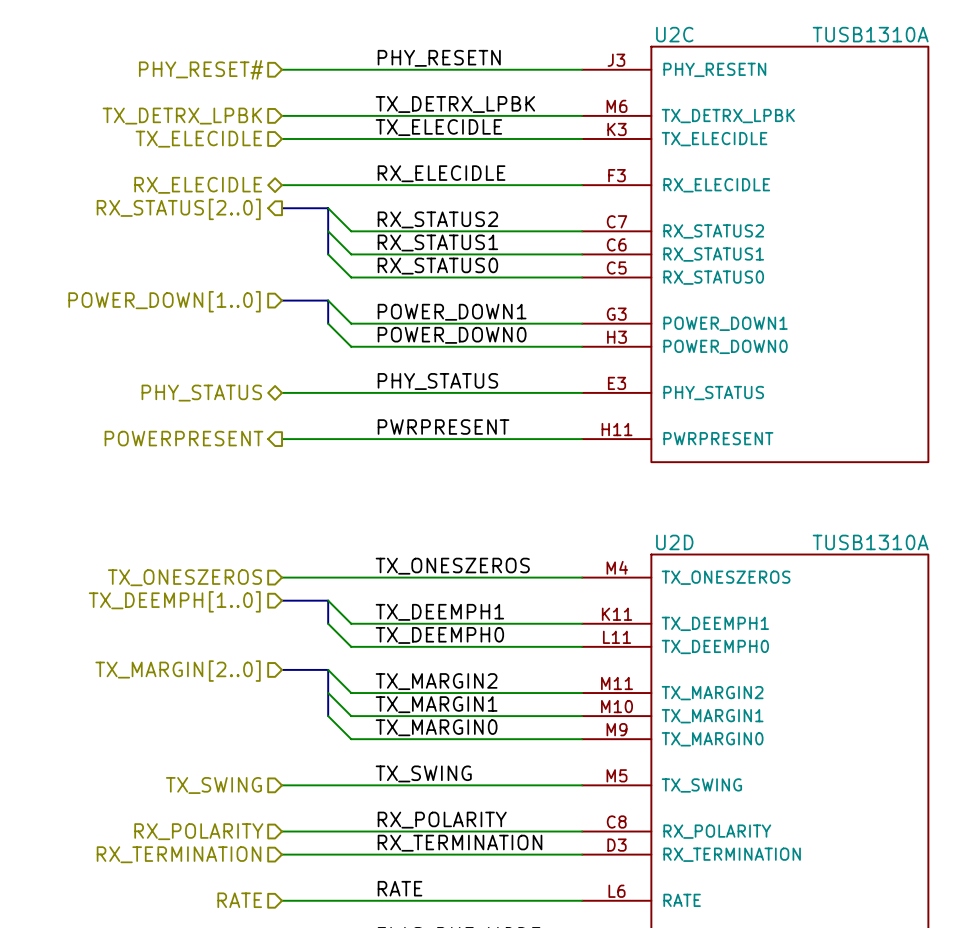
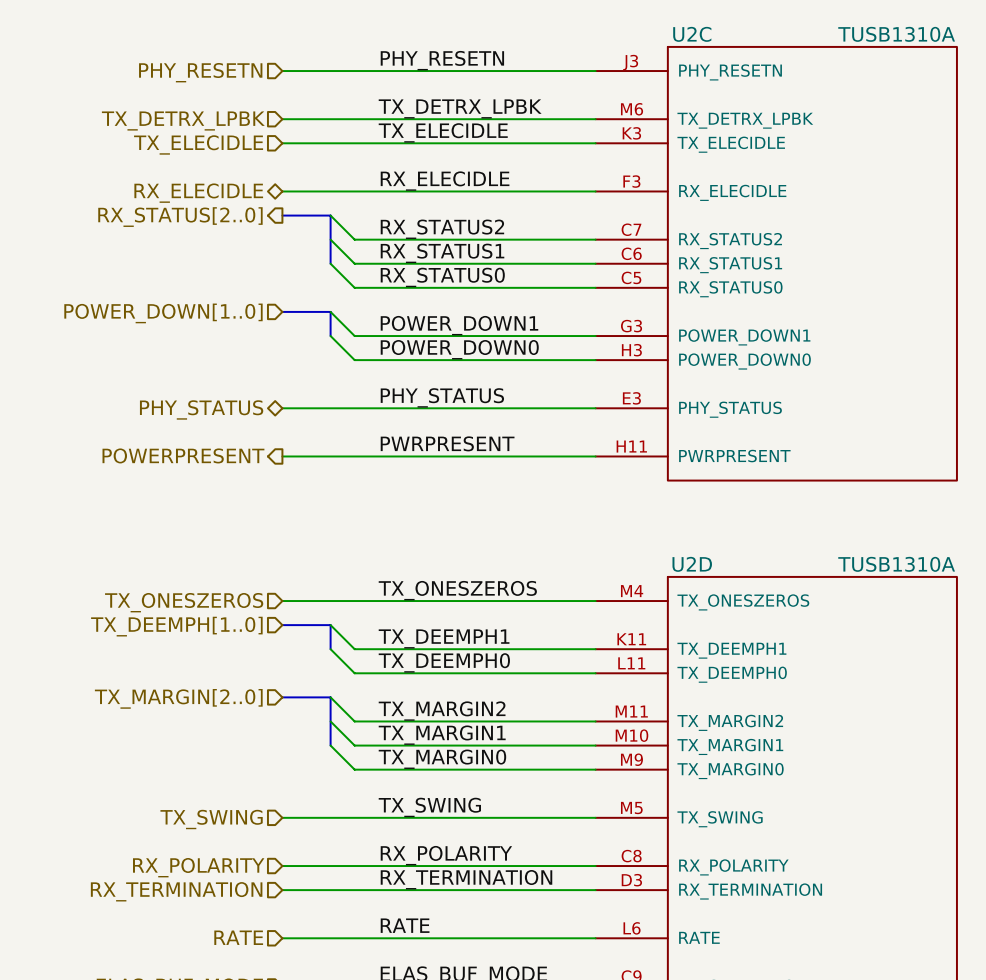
hierarchical label: PHY_RESET# (201, 69) -> PHY_RESETN (200, 72)

